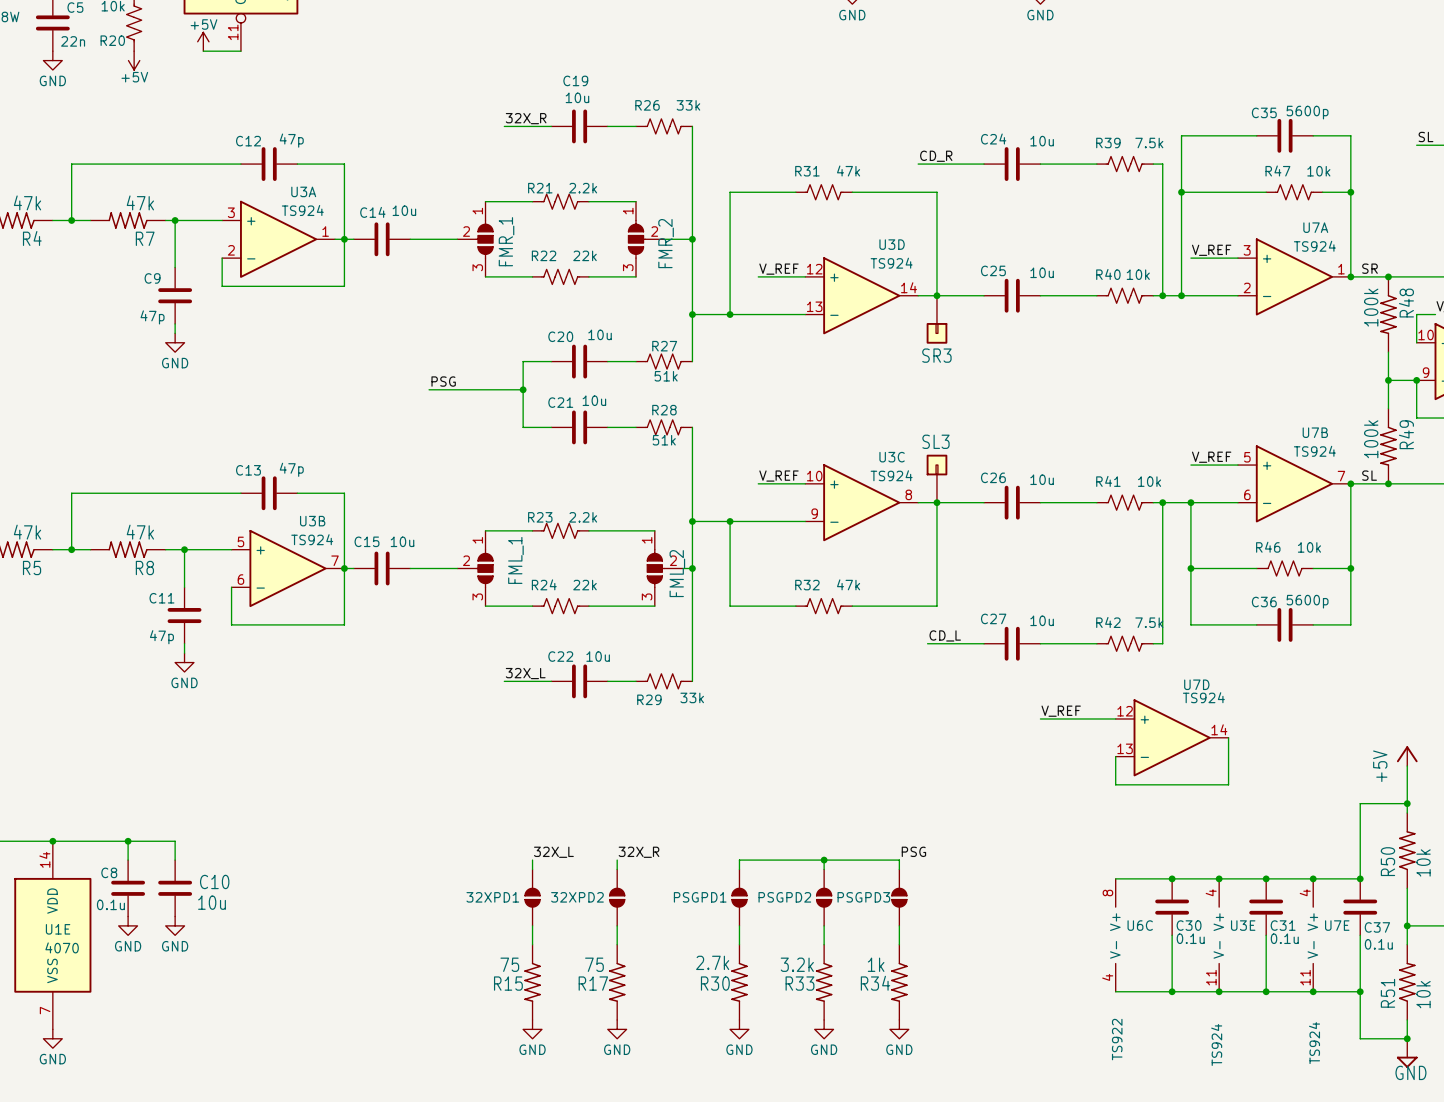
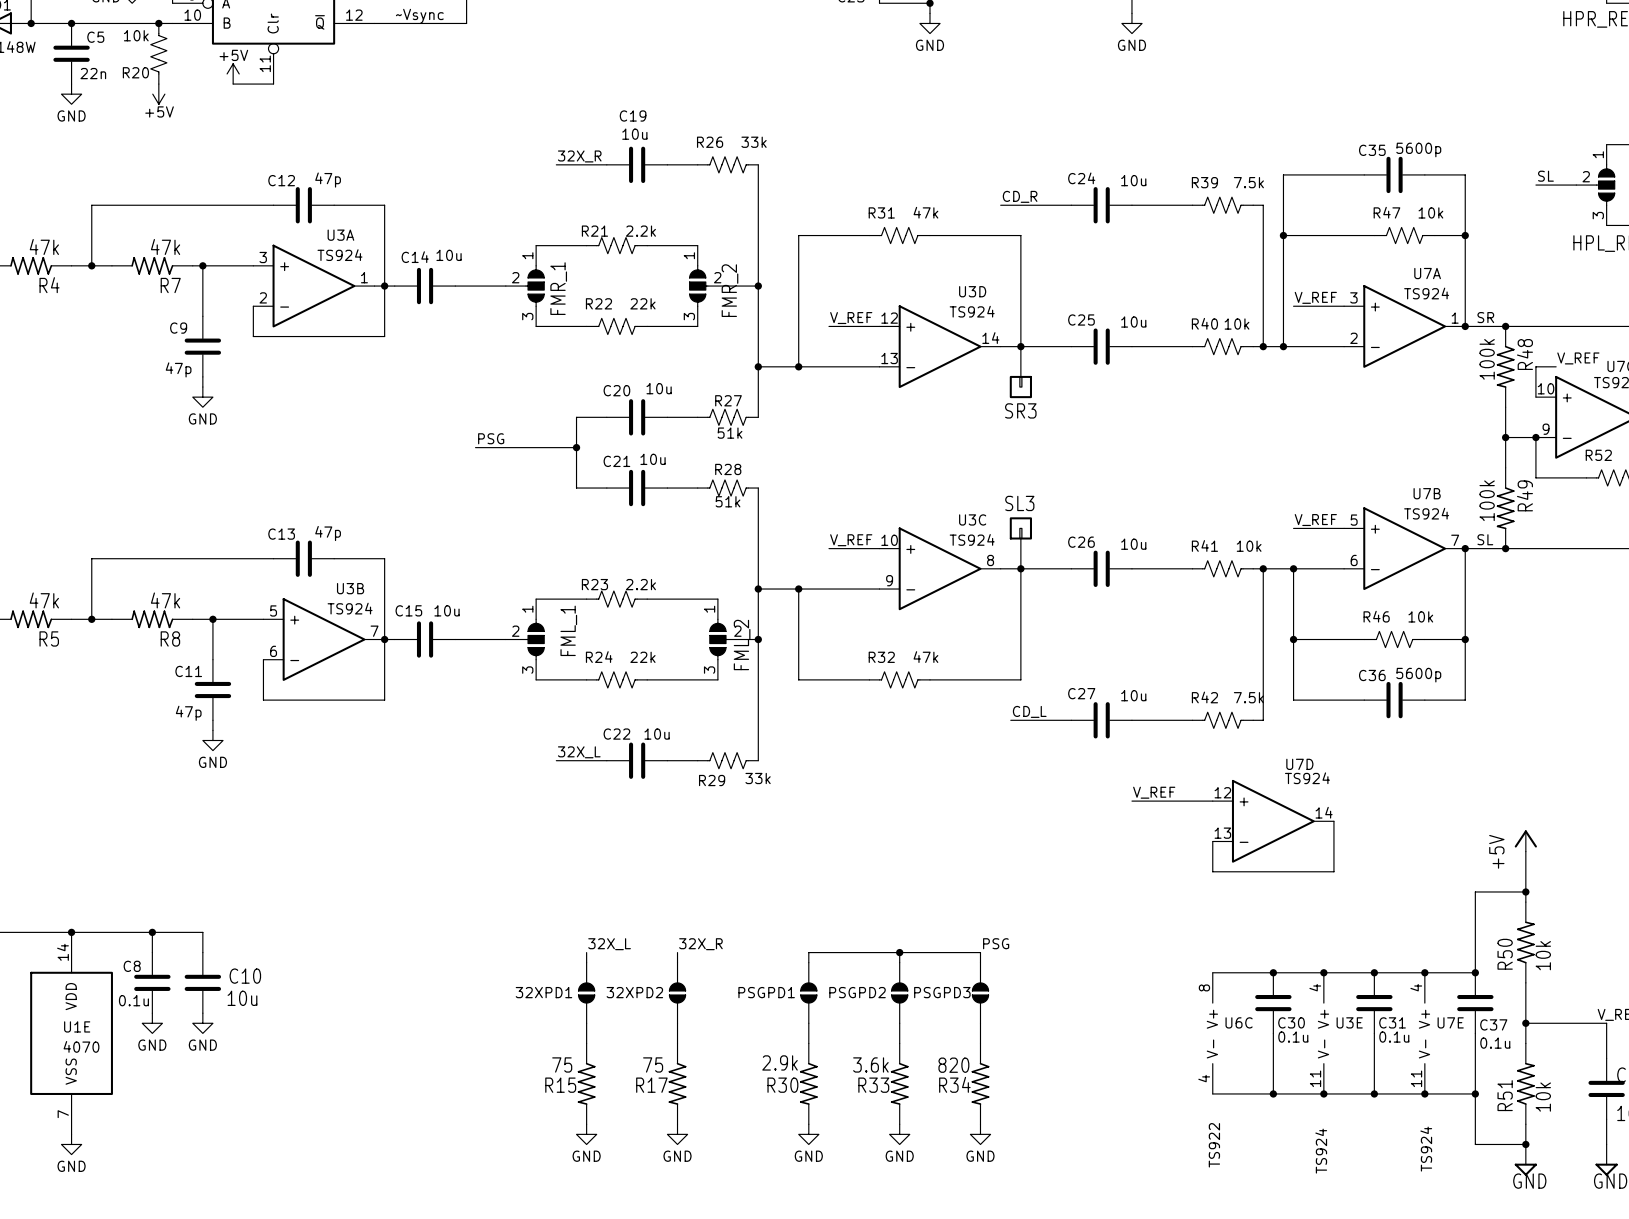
R30 value: 2.7k (712, 962) -> 2.9k (780, 1062)
R33 value: 3.2k (797, 964) -> 3.6k (870, 1064)
R34 value: 1k (876, 964) -> 820 (953, 1065)

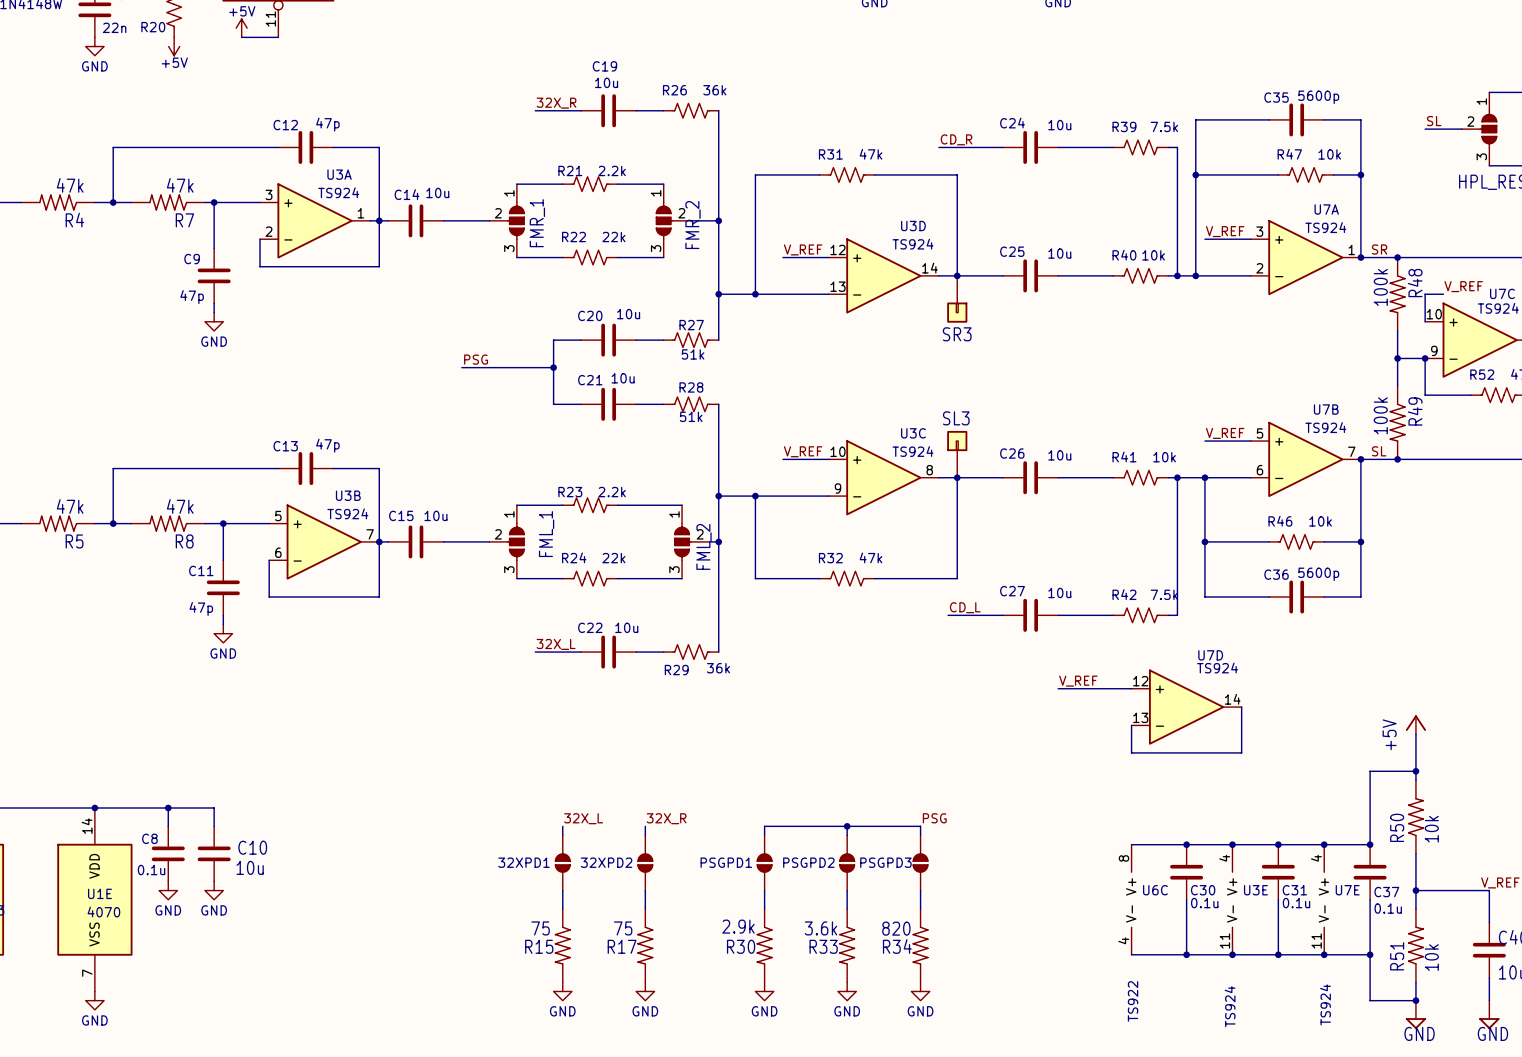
R26 value: 33k (754, 142) -> 36k (714, 90)
R29 value: 33k (758, 778) -> 36k (718, 668)

